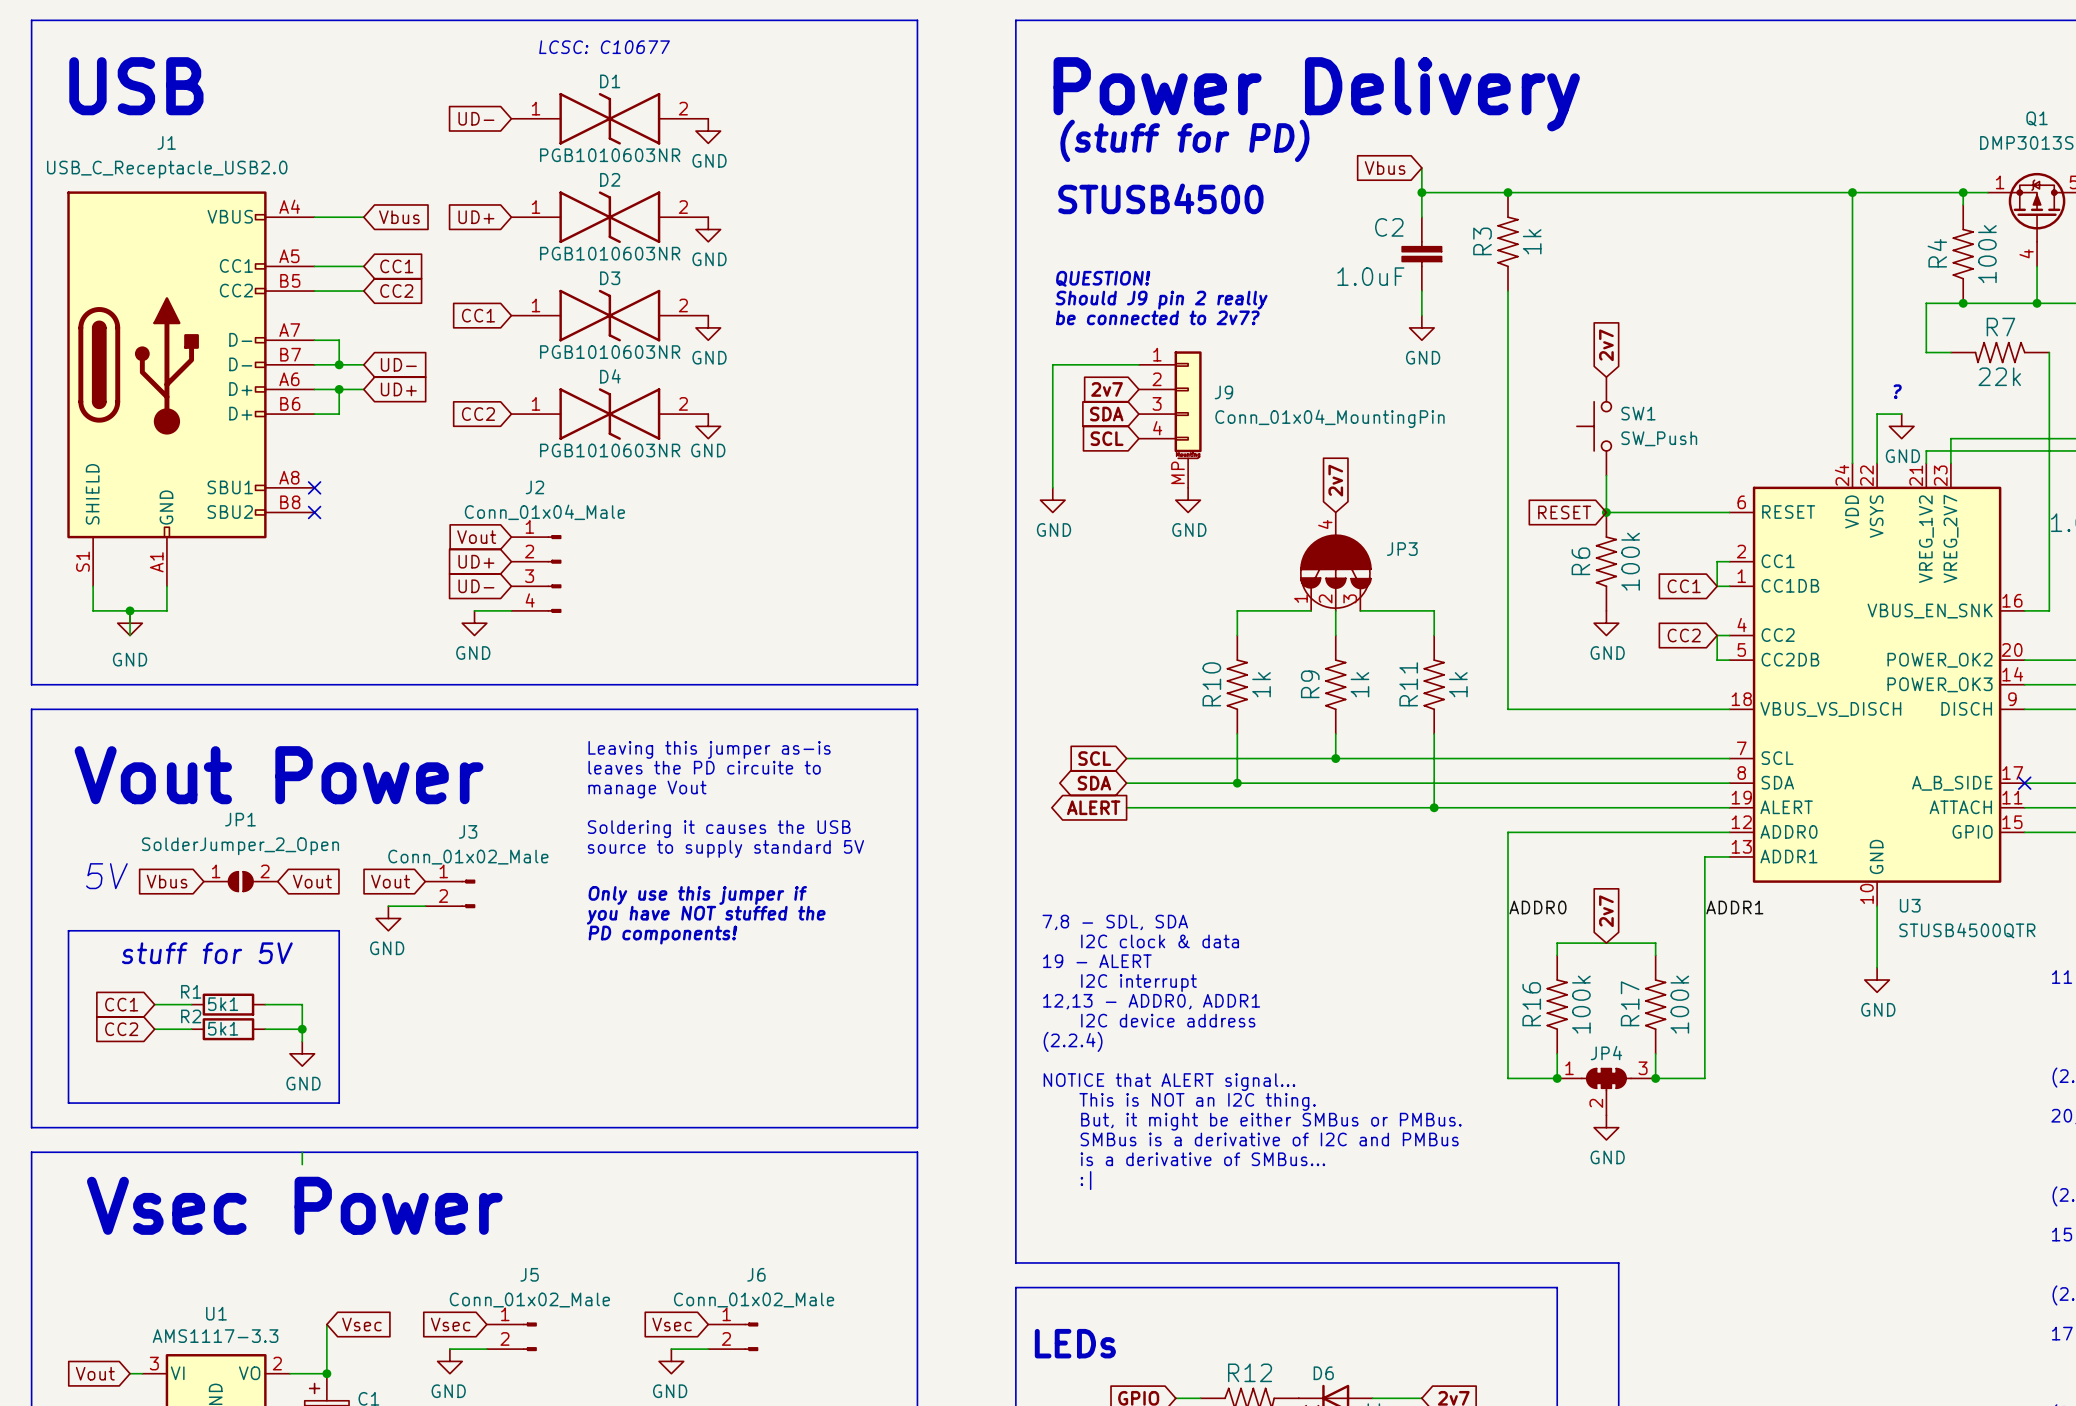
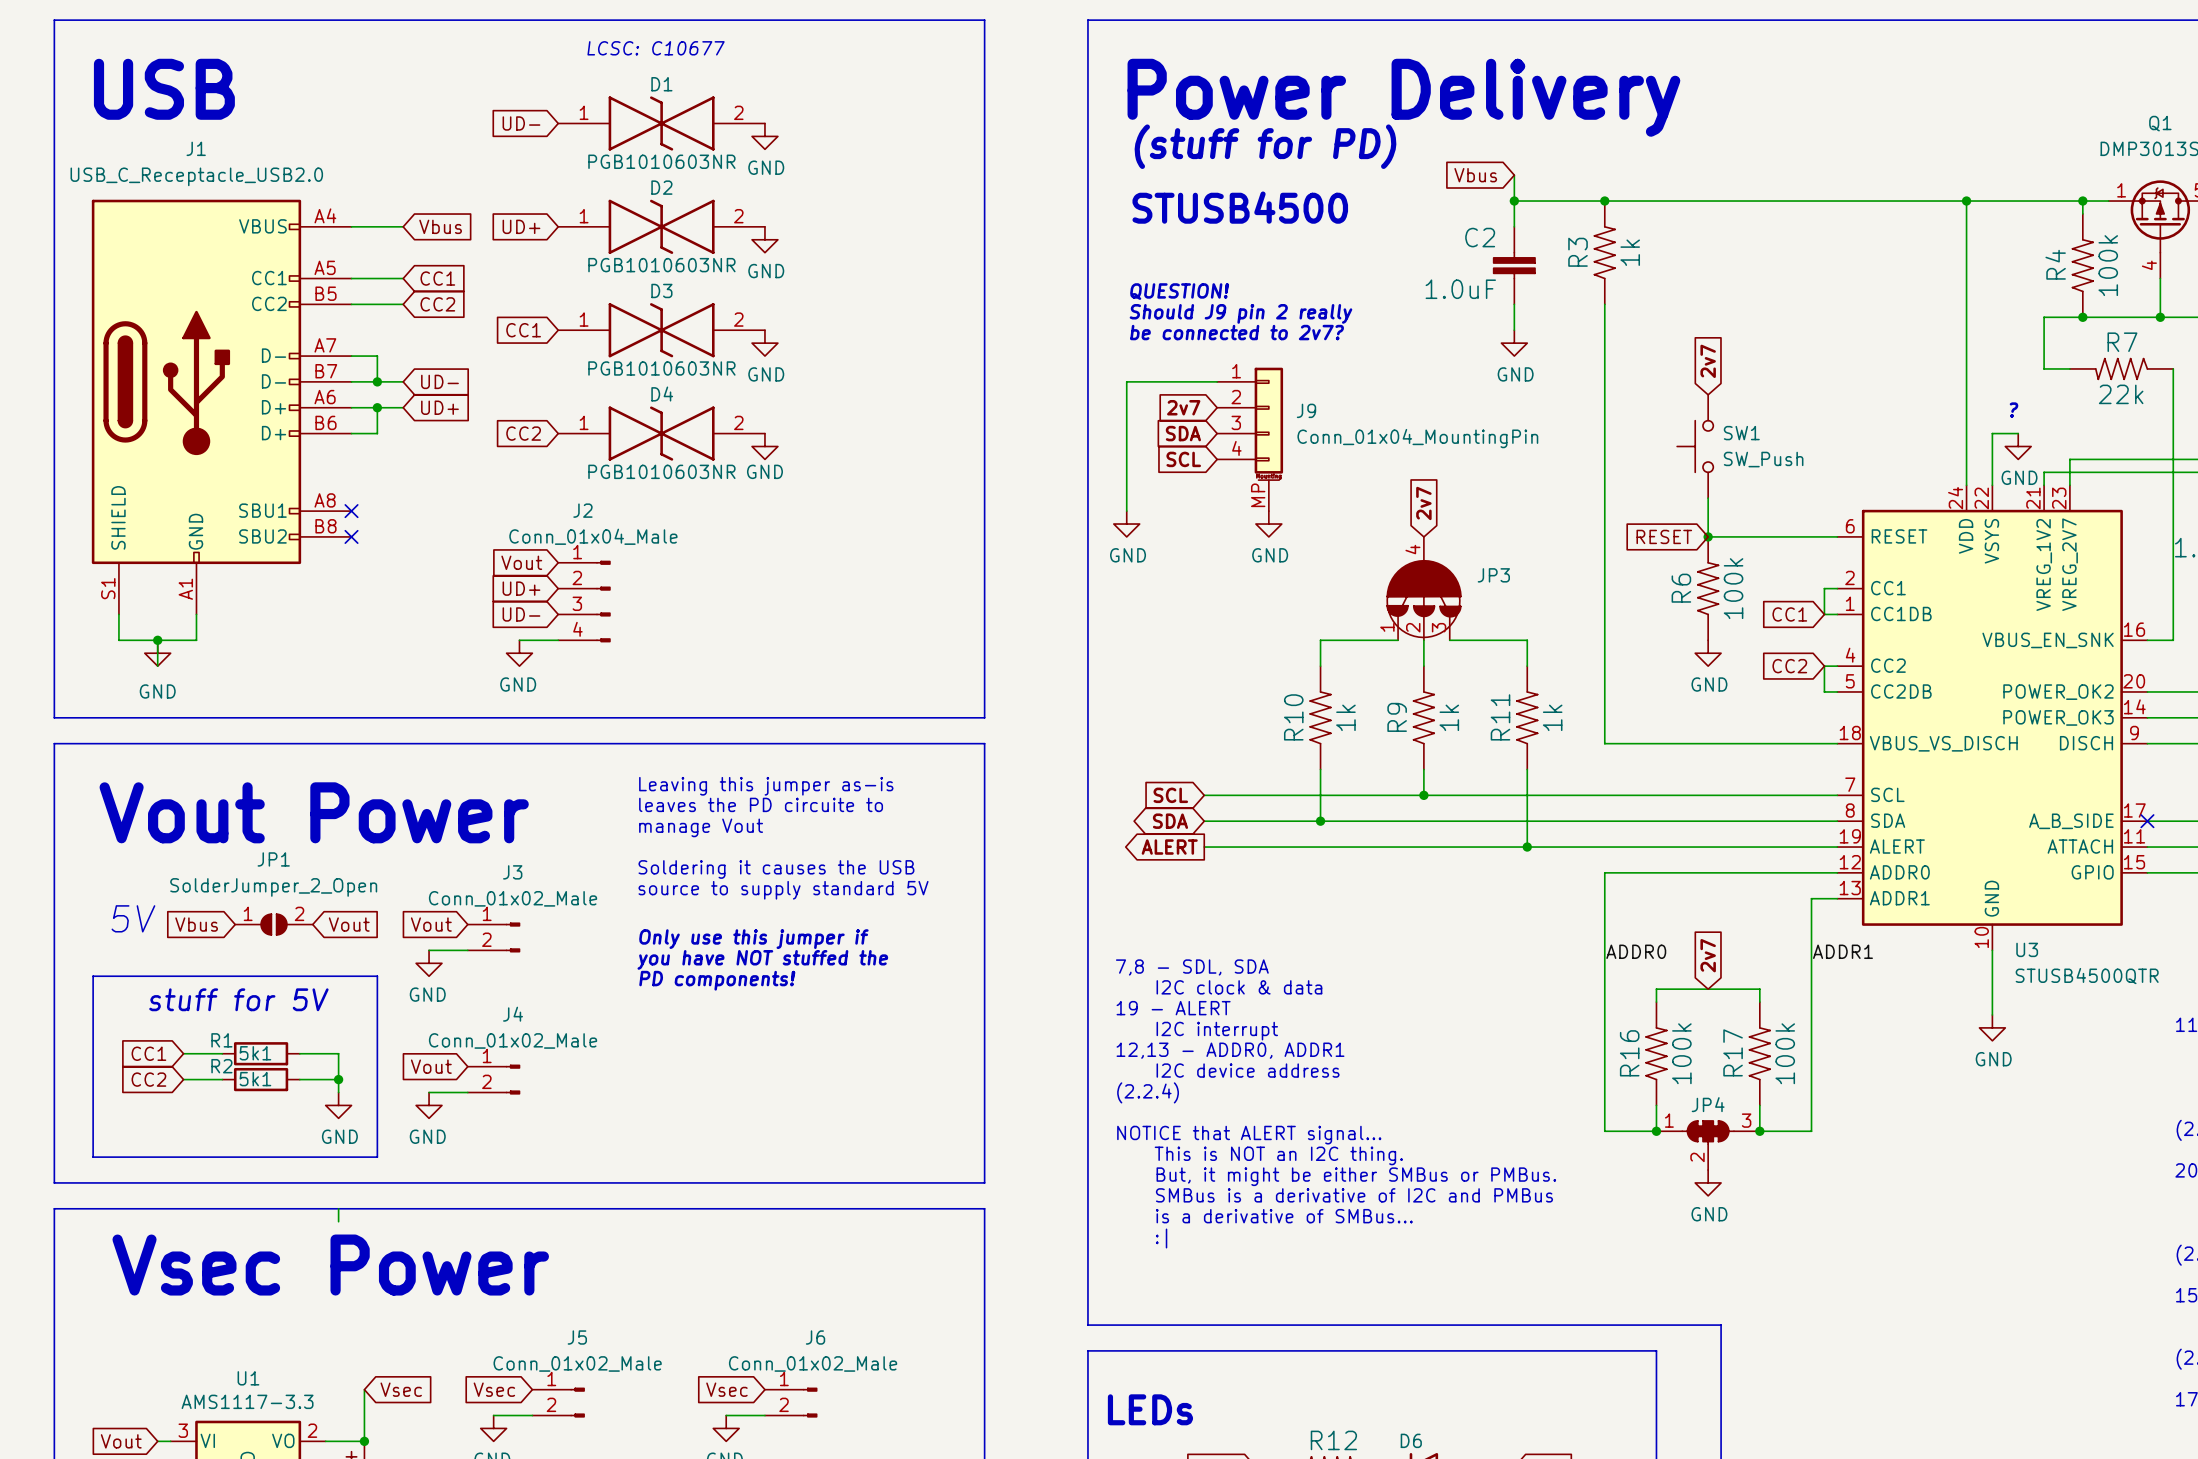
global label: none -> Vout (431, 1066)
J4: none -> Conn_01x02_Male (494, 1079)
wire: none -> (429, 1092) (467, 1092)
power symbol: none -> GND (429, 1105)

